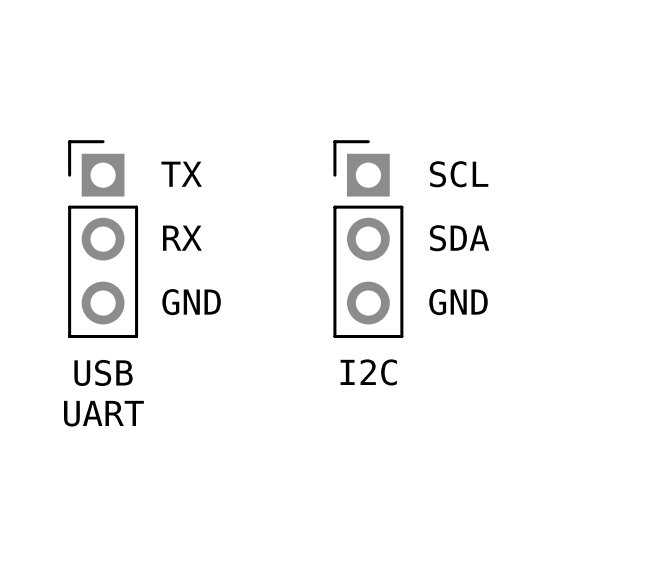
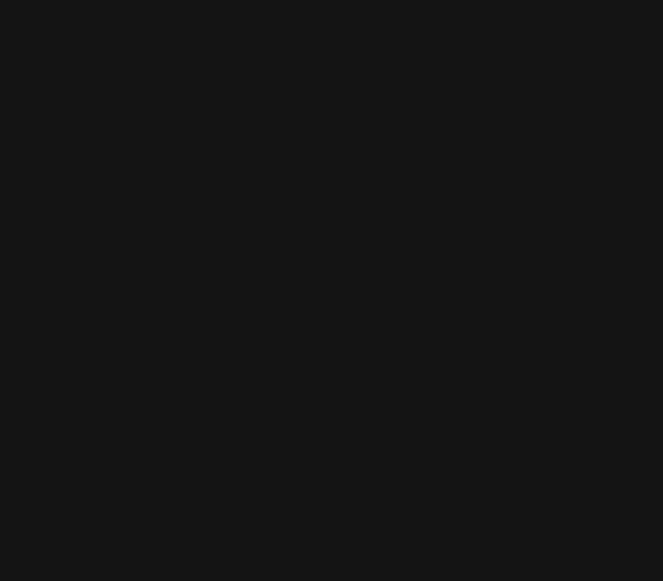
text: TX (181, 174) -> none
text: SCL (459, 174) -> none
text: RX (182, 238) -> none
text: SDA (459, 238) -> none
part: (103, 239) -> none
part: (368, 239) -> none
text: GND (191, 302) -> none
text: GND (458, 302) -> none
text: USB (103, 372) -> none
text: I2C (368, 372) -> none
text: UART (103, 413) -> none

